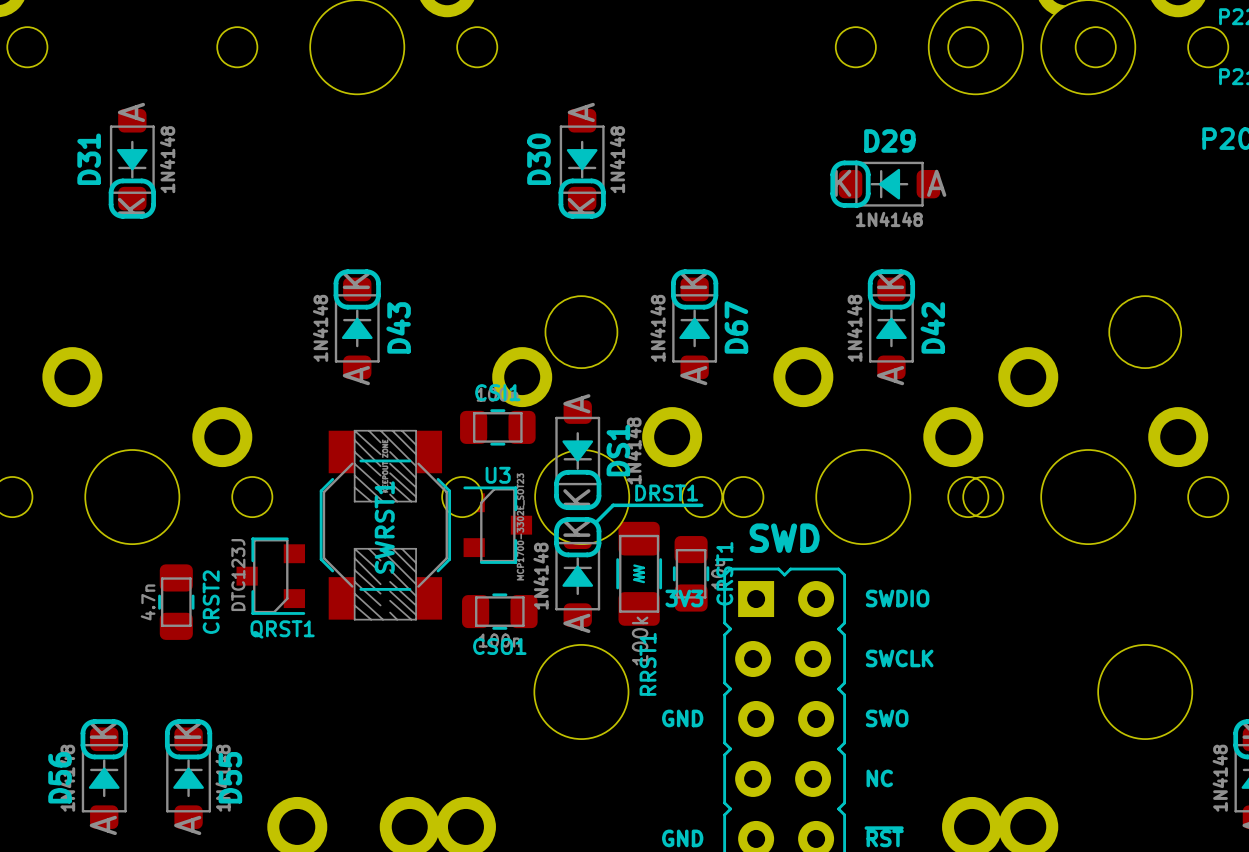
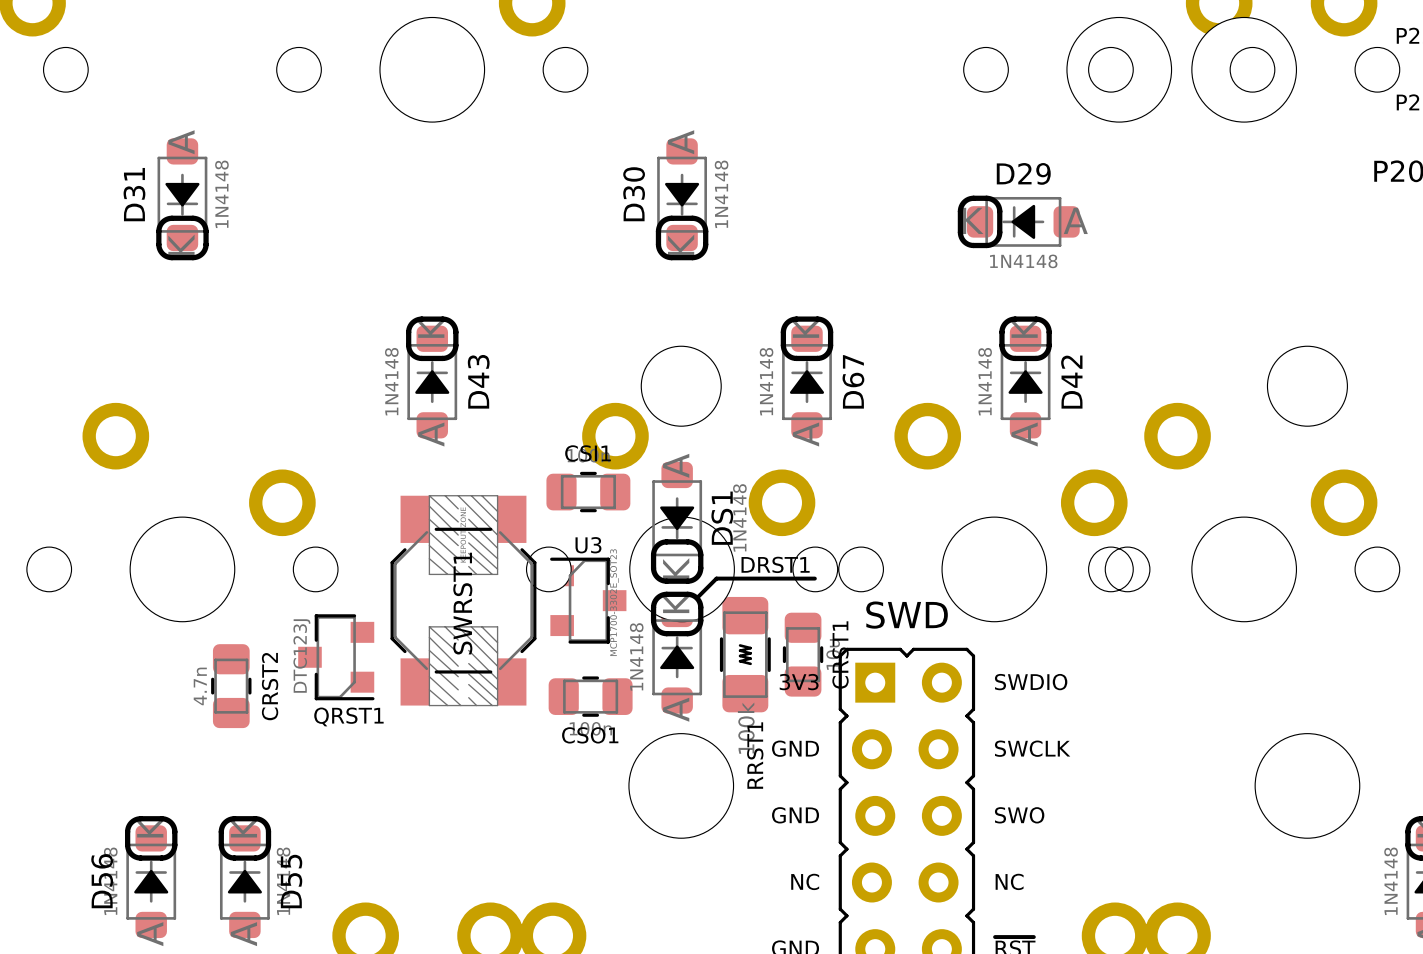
part text: none -> GND (795, 748)
part text: none -> NC (805, 881)

